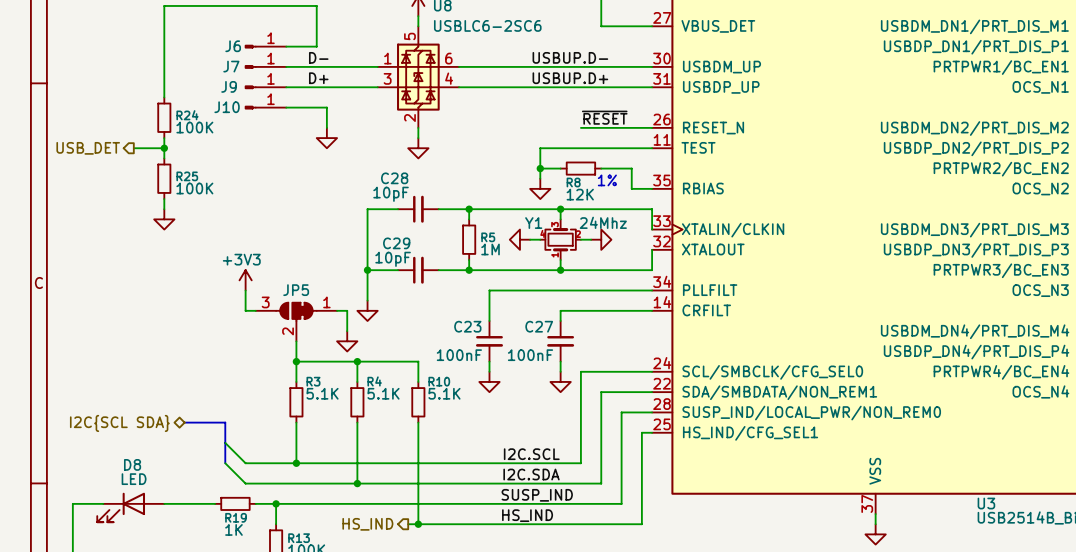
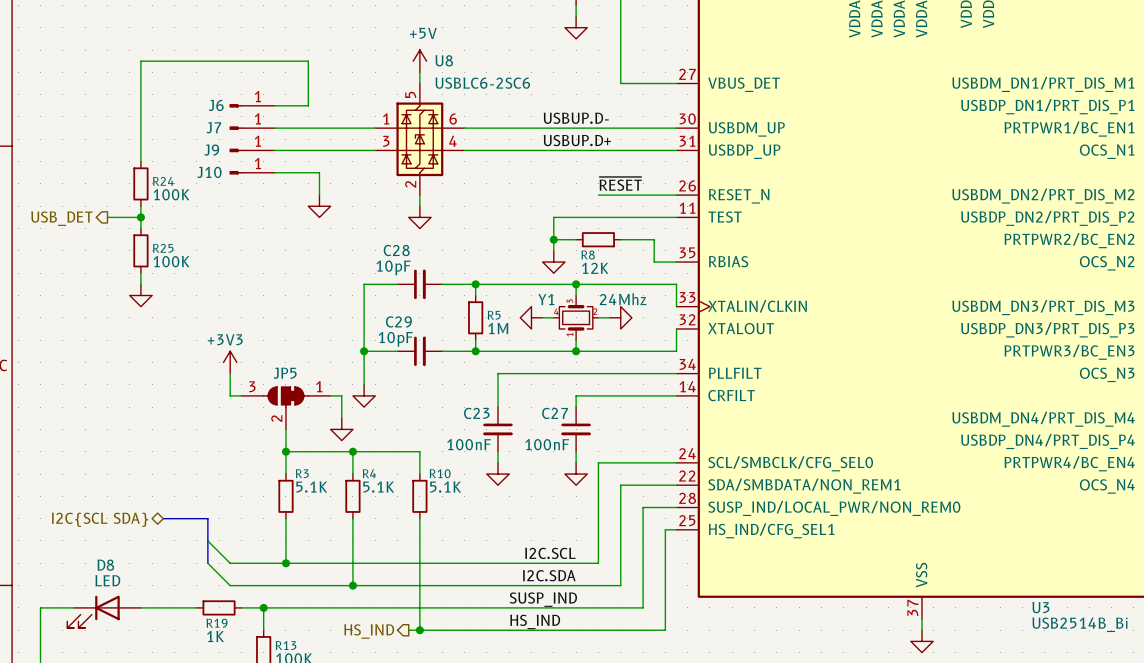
label: D- (318, 57) -> none
label: D+ (318, 78) -> none
text: 1% (607, 180) -> none

